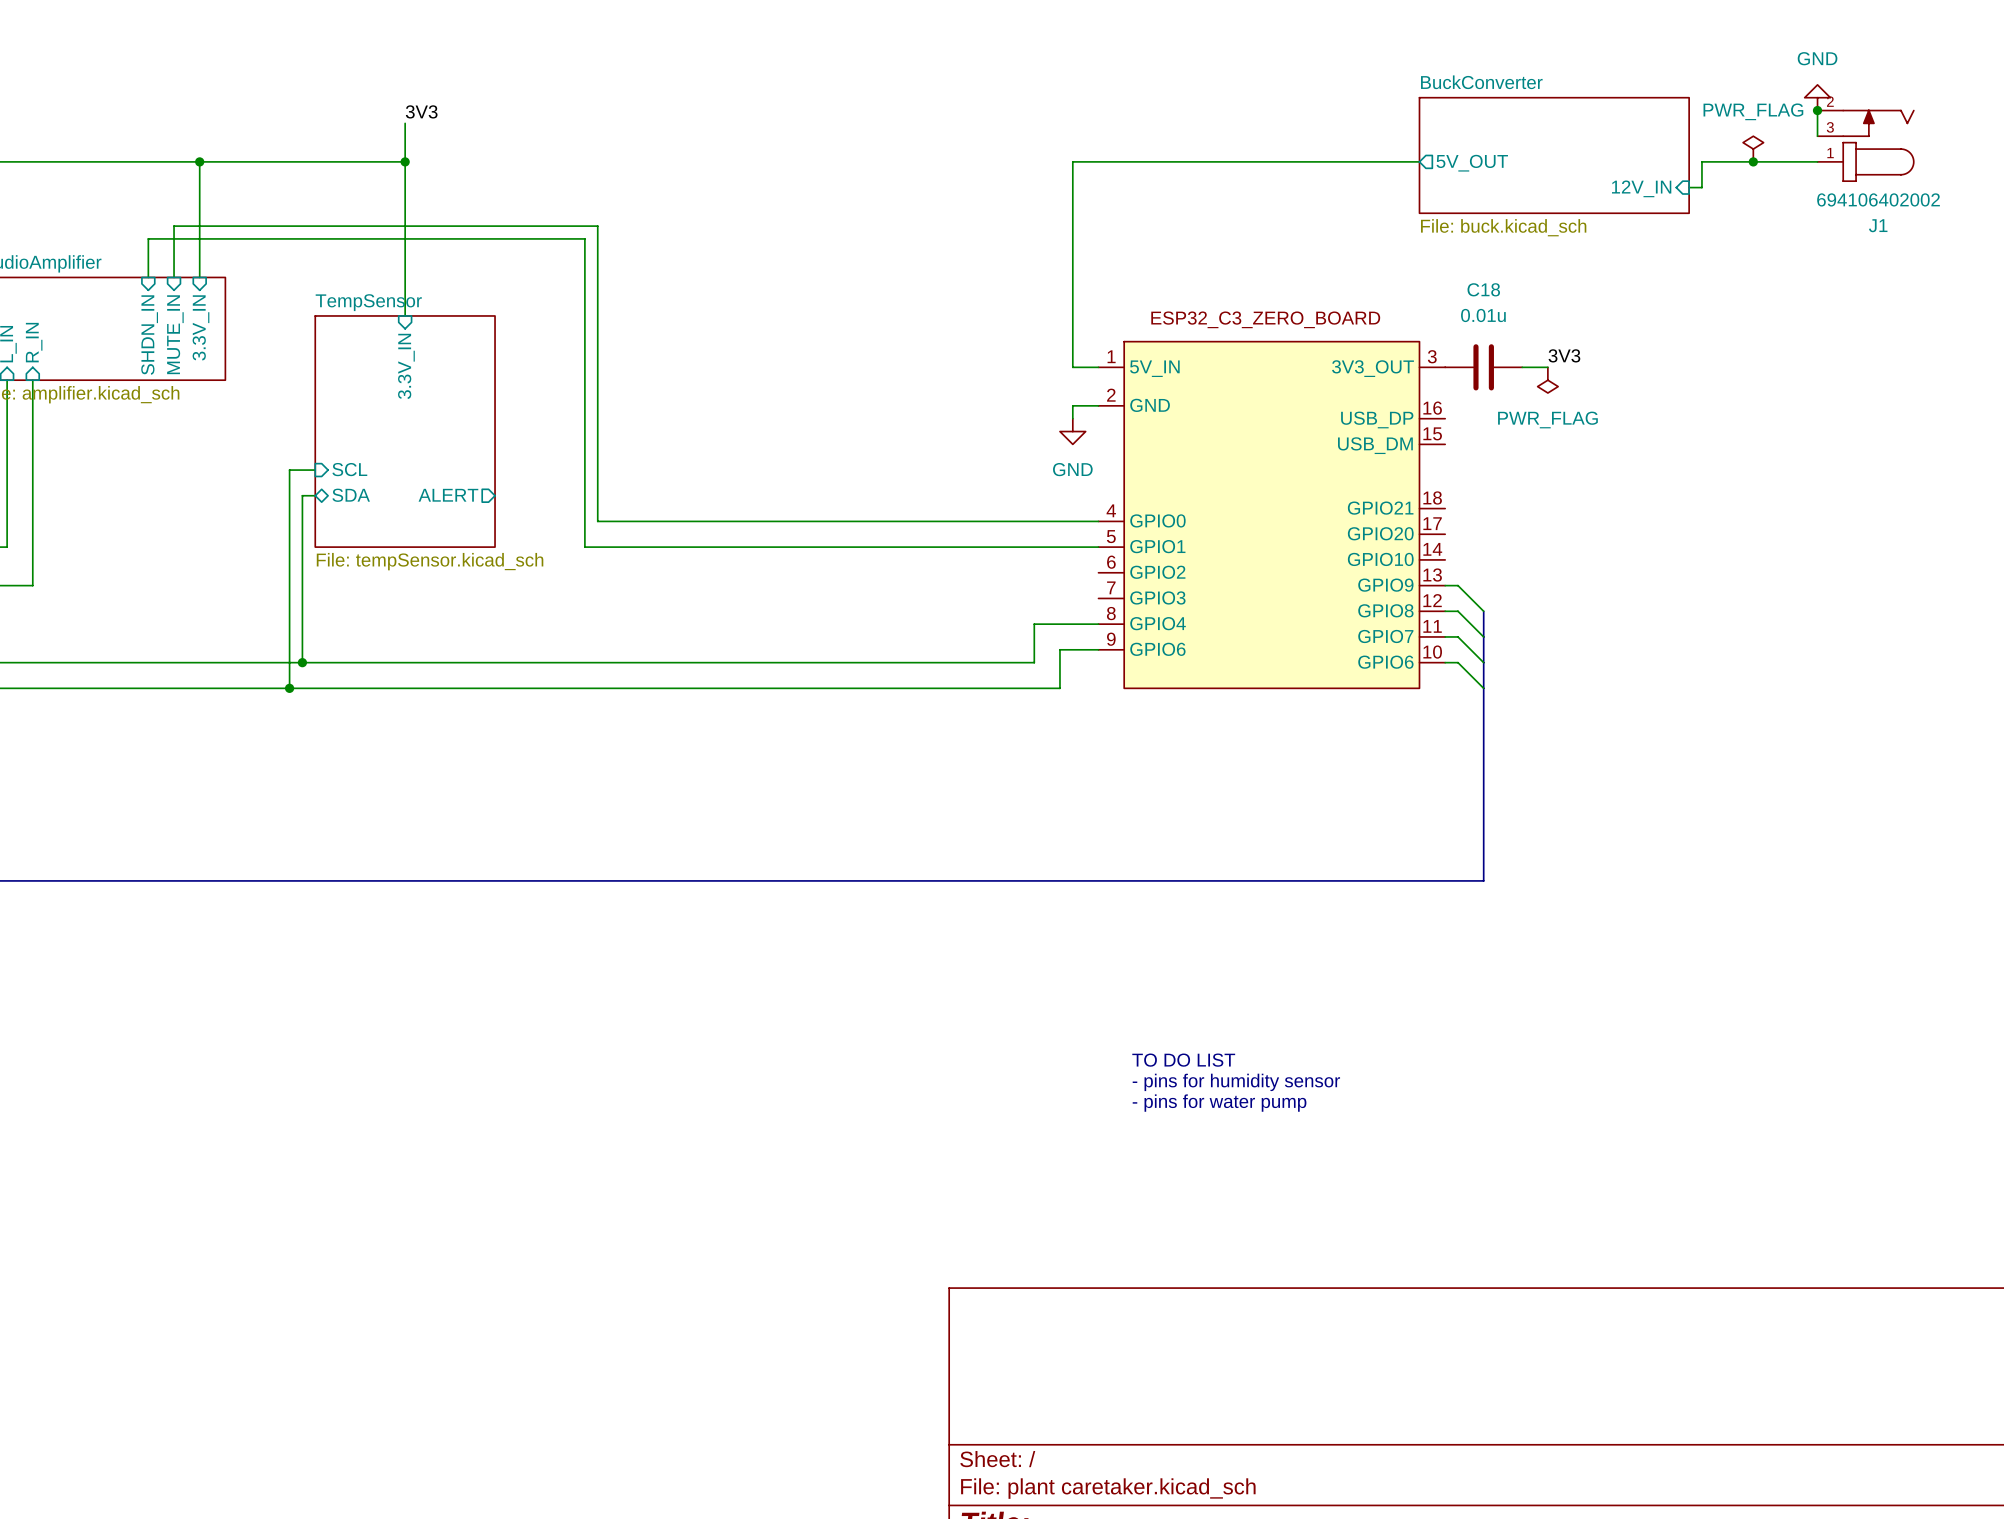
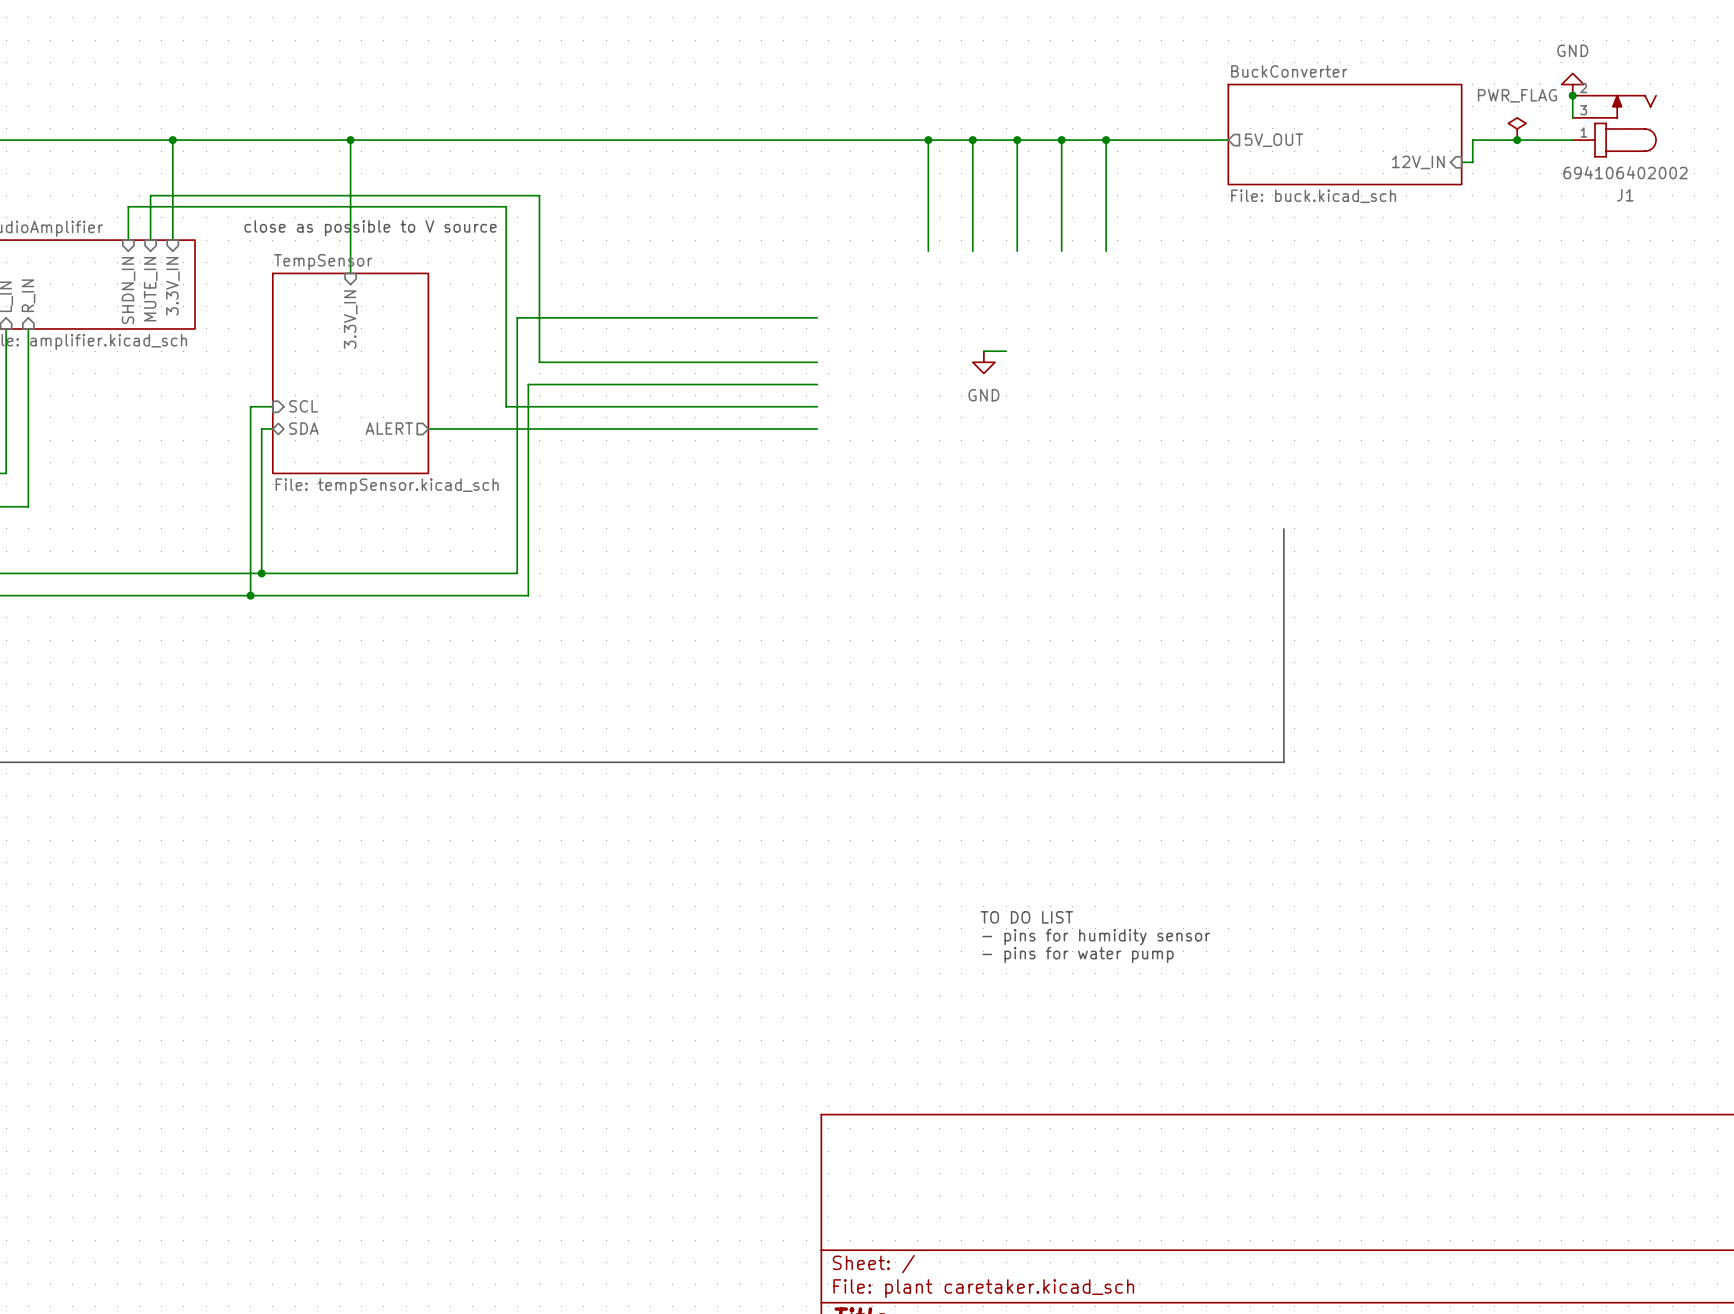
label: 3V3 (421, 111) -> none
wire: (405, 123) (405, 161) -> (928, 140) (350, 140)
junction: none -> (928, 140)
wire: none -> (972, 140) (972, 251)
junction: none -> (972, 140)
wire: none -> (1017, 140) (1017, 251)
junction: none -> (1017, 140)
wire: none -> (1061, 140) (1061, 251)
junction: none -> (1061, 140)
wire: none -> (1106, 140) (1106, 251)
junction: none -> (1106, 140)
wire: (597, 226) (597, 367) -> (517, 195) (539, 195) (539, 362) (817, 362)
text: none -> close as possible to V source (370, 228)
wire: (1072, 290) (1072, 367) (1098, 367) -> none
label: 3V3 (1564, 355) -> none
wire: none -> (517, 317) (817, 317)
C18: 0.01u (1483, 367) -> none
wire: (1522, 367) (1547, 367) -> none
power symbol: PWR_FLAG (1547, 380) -> none
wire: (1098, 405) (1072, 405) (1072, 418) -> none
power symbol position: GND (1072, 431) -> GND (983, 362)
wire: (584, 470) (584, 547) (1098, 547) -> (506, 406) (817, 406)
wire: none -> (428, 428) (817, 428)
part: (1271, 515) -> none
wire: (597, 521) (1098, 521) -> none
wire: (1445, 585) (1458, 585) (1483, 611) -> none
wire: (1445, 611) (1458, 611) (1483, 636) -> none
wire: (1098, 624) (1034, 624) (1034, 662) (597, 662) -> (517, 451) (517, 573)
wire: (1445, 636) (1458, 636) (1483, 662) -> none
wire: (1098, 649) (1059, 649) (1059, 688) (610, 688) -> (817, 384) (528, 384) (528, 595)
wire: (1445, 662) (1458, 662) (1483, 688) -> none

